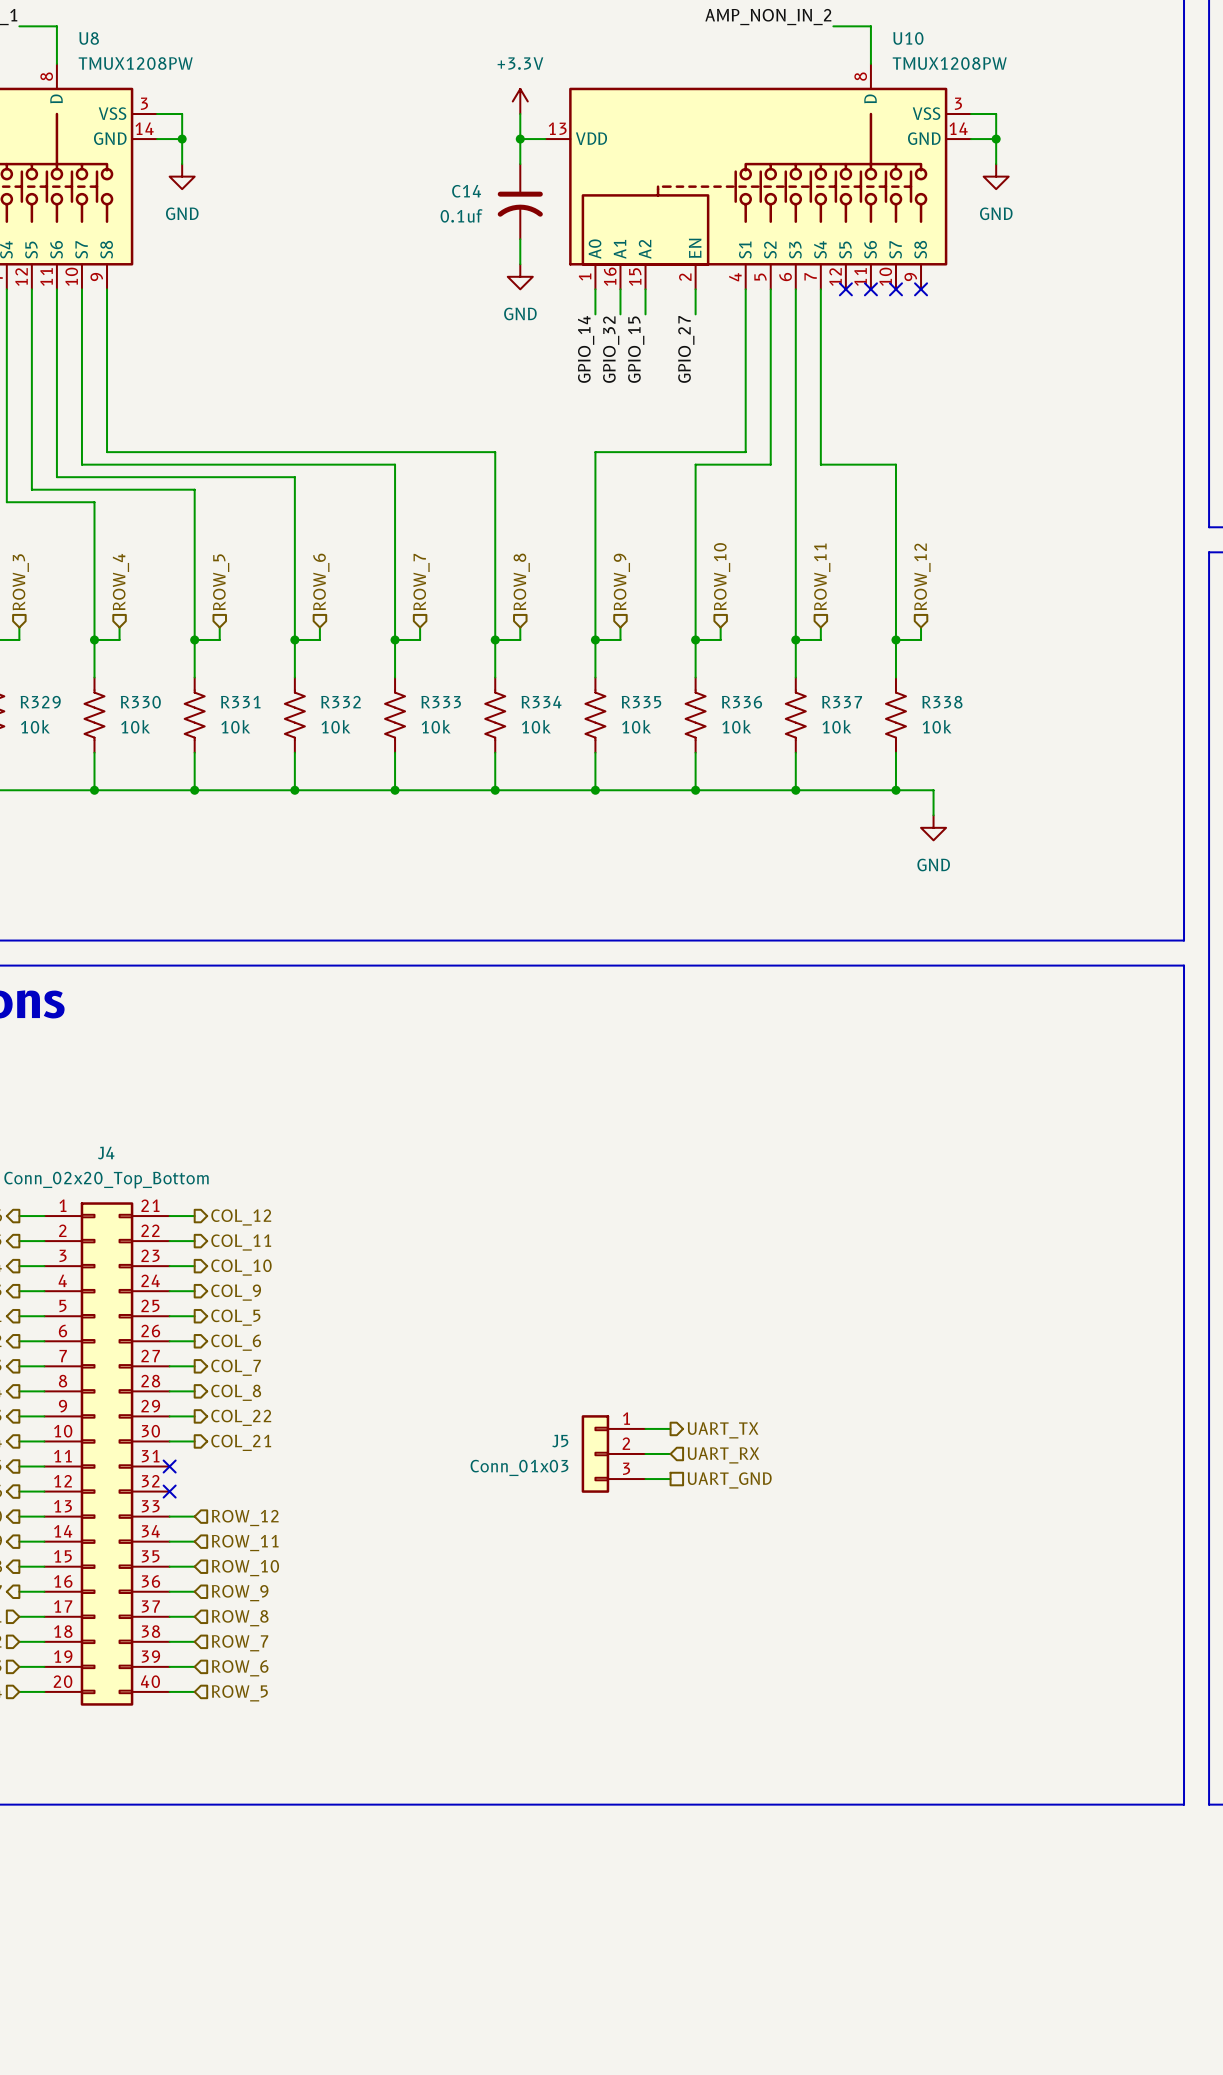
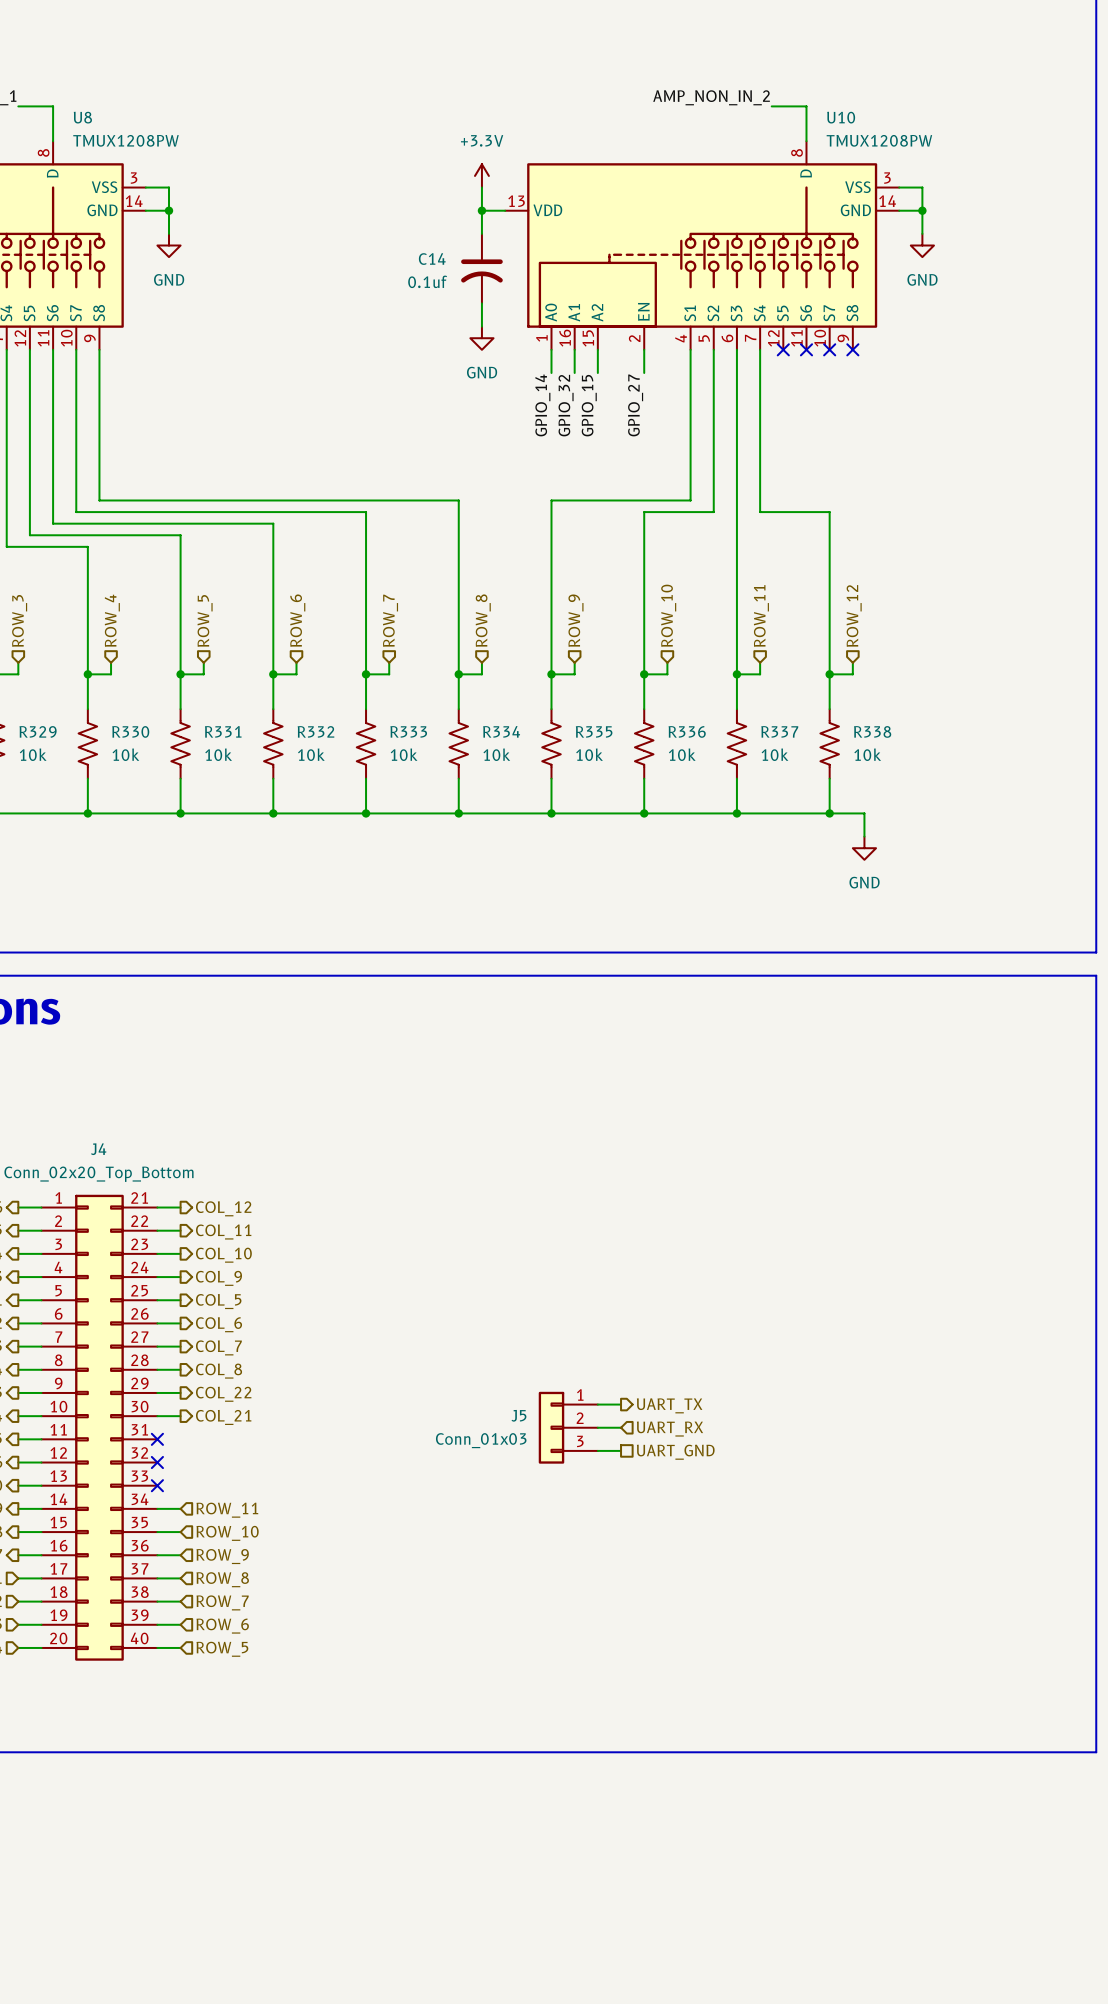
wire: (169, 1516) (194, 1516) -> none
no-connect mark: none -> (157, 1485)
hierarchical label: ROW_12 (245, 1518) -> none

